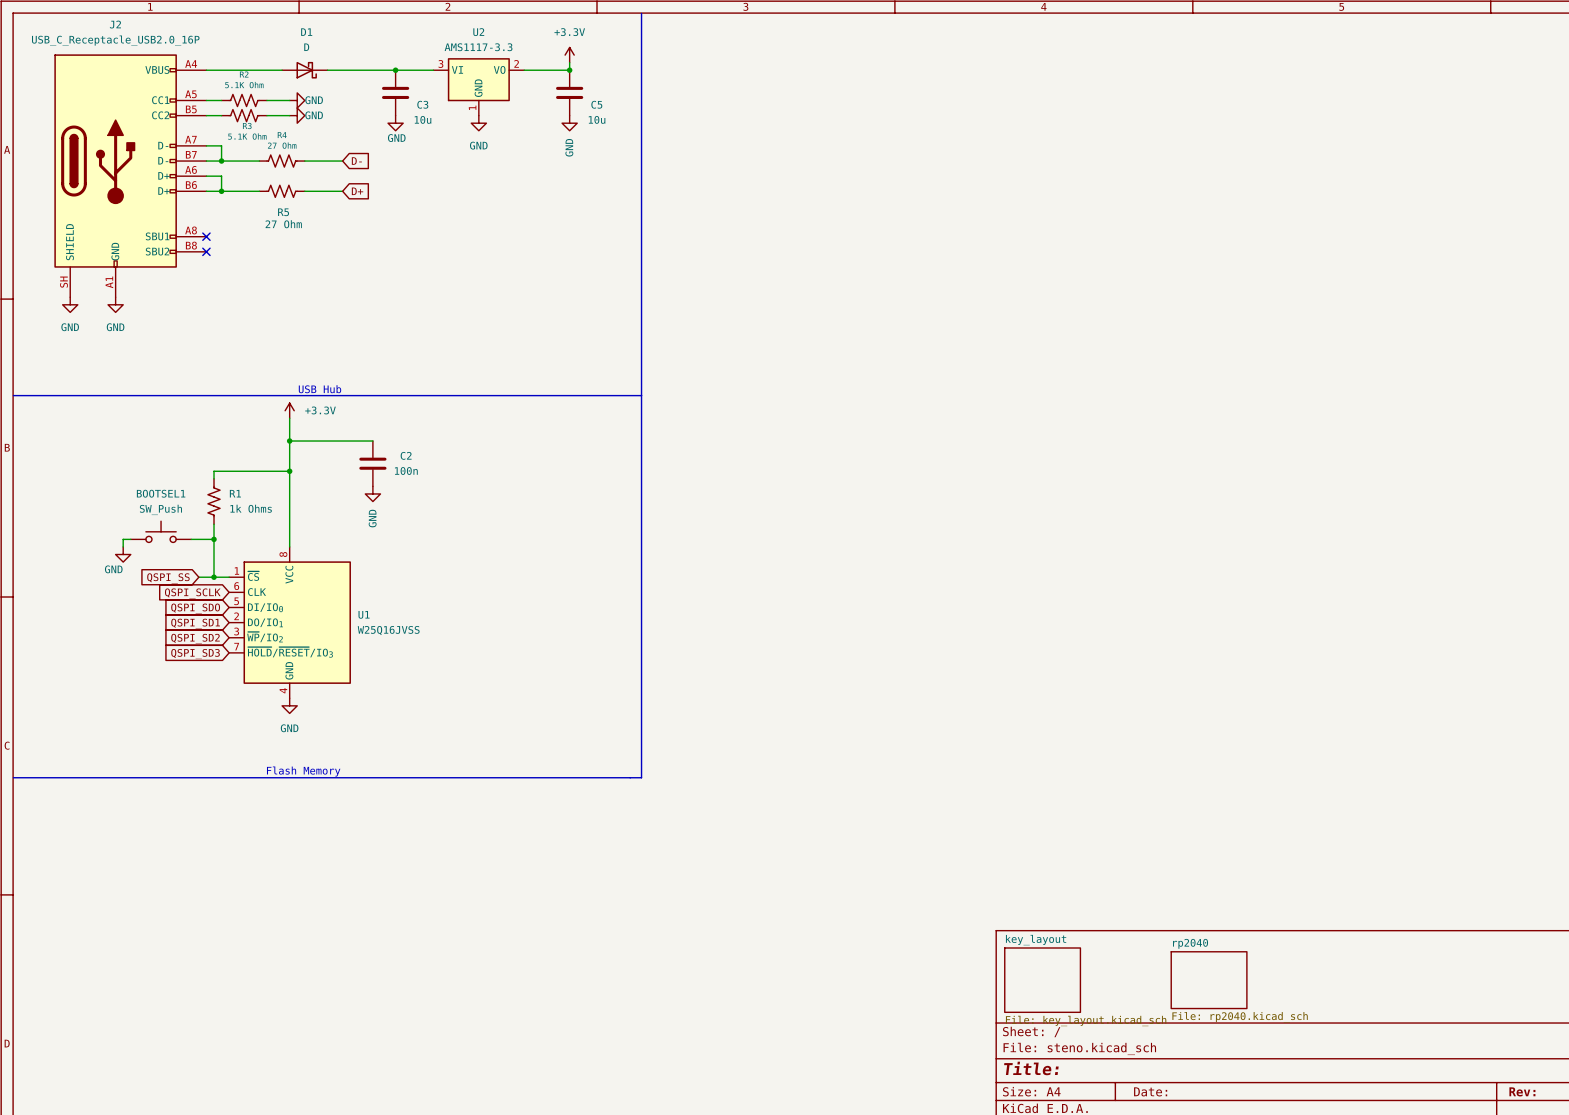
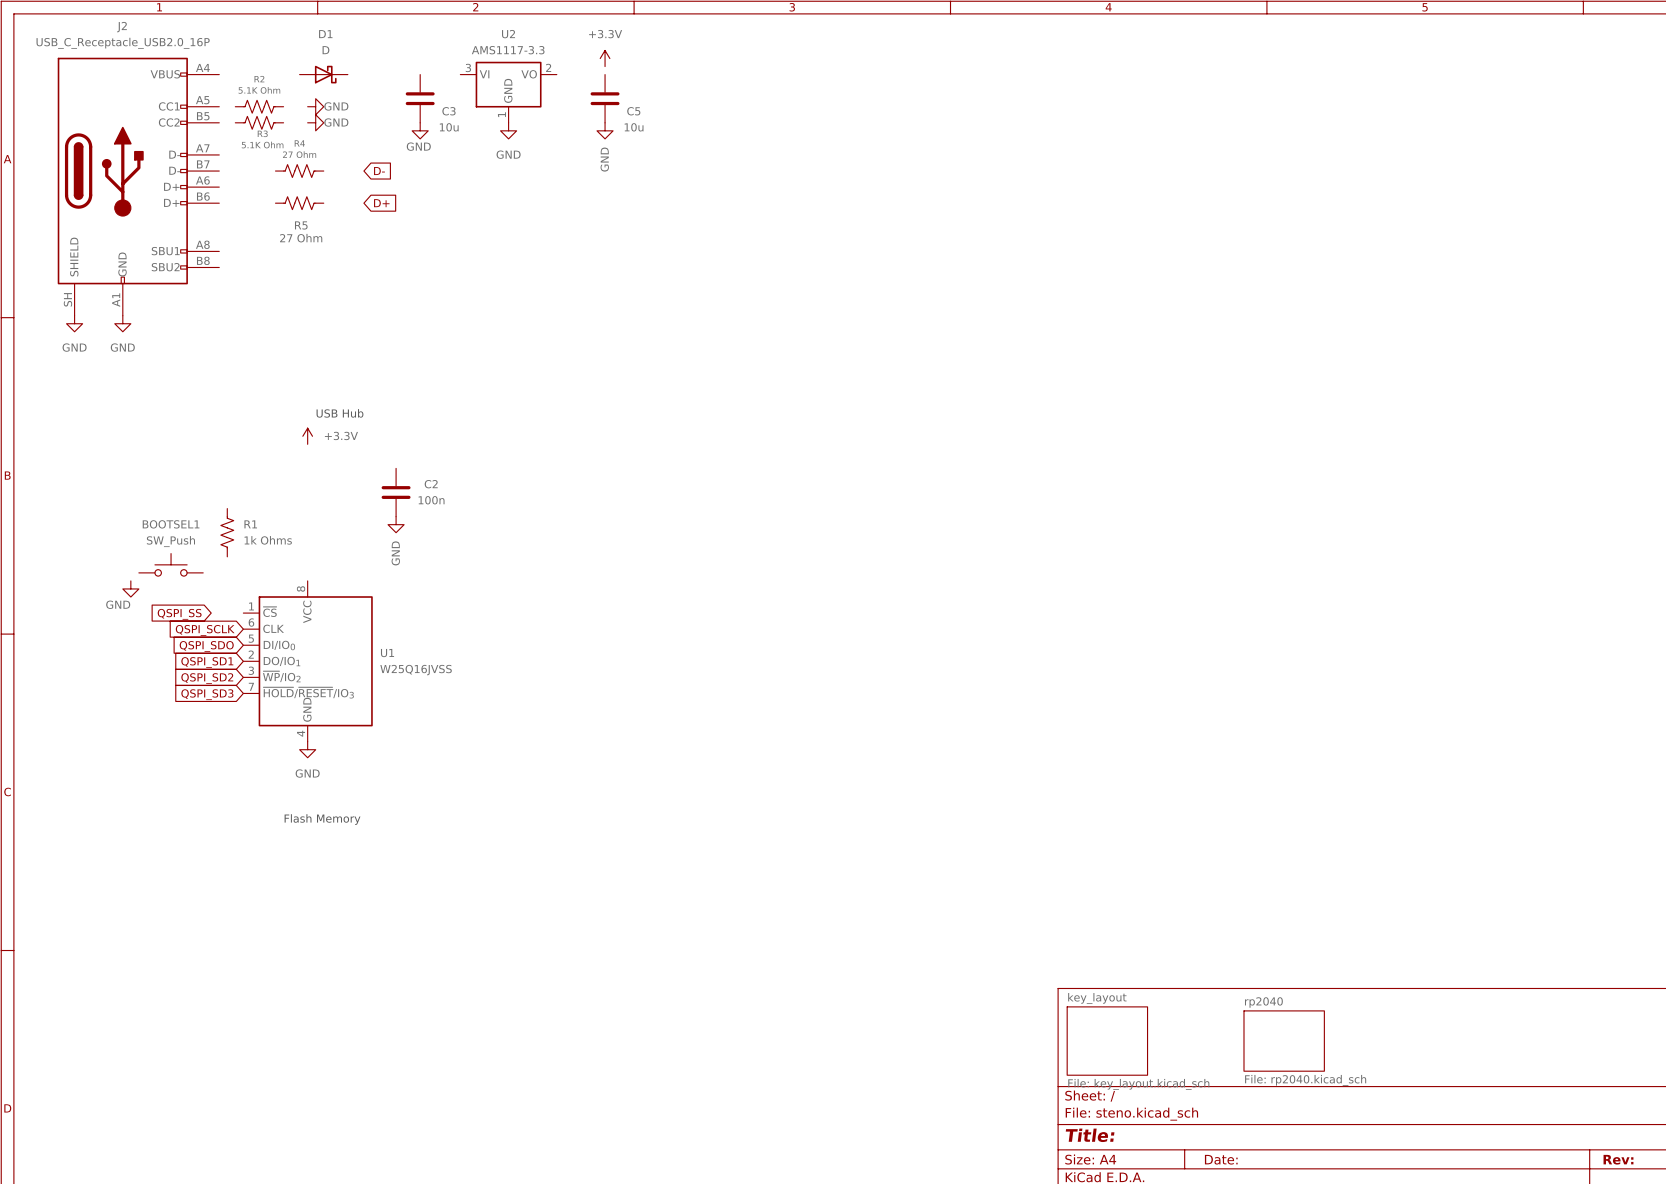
line: (641, 13) (641, 777) (13, 777) -> none
wire: (569, 62) (569, 70) (524, 70) -> none
wire: (206, 70) (282, 70) -> none
wire: (327, 70) (433, 70) -> none
junction: (395, 70) -> none
junction: (569, 70) -> none
wire: (206, 100) (221, 100) -> none
wire: (266, 100) (289, 100) -> none
wire: (206, 115) (221, 115) -> none
wire: (266, 115) (289, 115) -> none
wire: (206, 145) (221, 145) (221, 161) -> none
wire: (206, 161) (259, 161) -> none
junction: (221, 161) -> none
wire: (304, 161) (342, 161) -> none
wire: (206, 176) (221, 176) (221, 191) -> none
wire: (206, 191) (259, 191) -> none
junction: (221, 191) -> none
wire: (304, 191) (342, 191) -> none
no-connect mark: (206, 236) -> none
no-connect mark: (206, 251) -> none
line: (13, 395) (641, 395) -> none
wire: (289, 418) (289, 546) -> none
wire: (289, 441) (372, 441) -> none
junction: (289, 441) -> none
wire: (289, 471) (214, 471) (214, 478) -> none
junction: (289, 471) -> none
wire: (214, 524) (214, 577) -> none
wire: (130, 539) (123, 539) (123, 546) -> none
wire: (191, 539) (214, 539) -> none
junction: (214, 539) -> none
wire: (198, 577) (229, 577) -> none
junction: (214, 577) -> none

